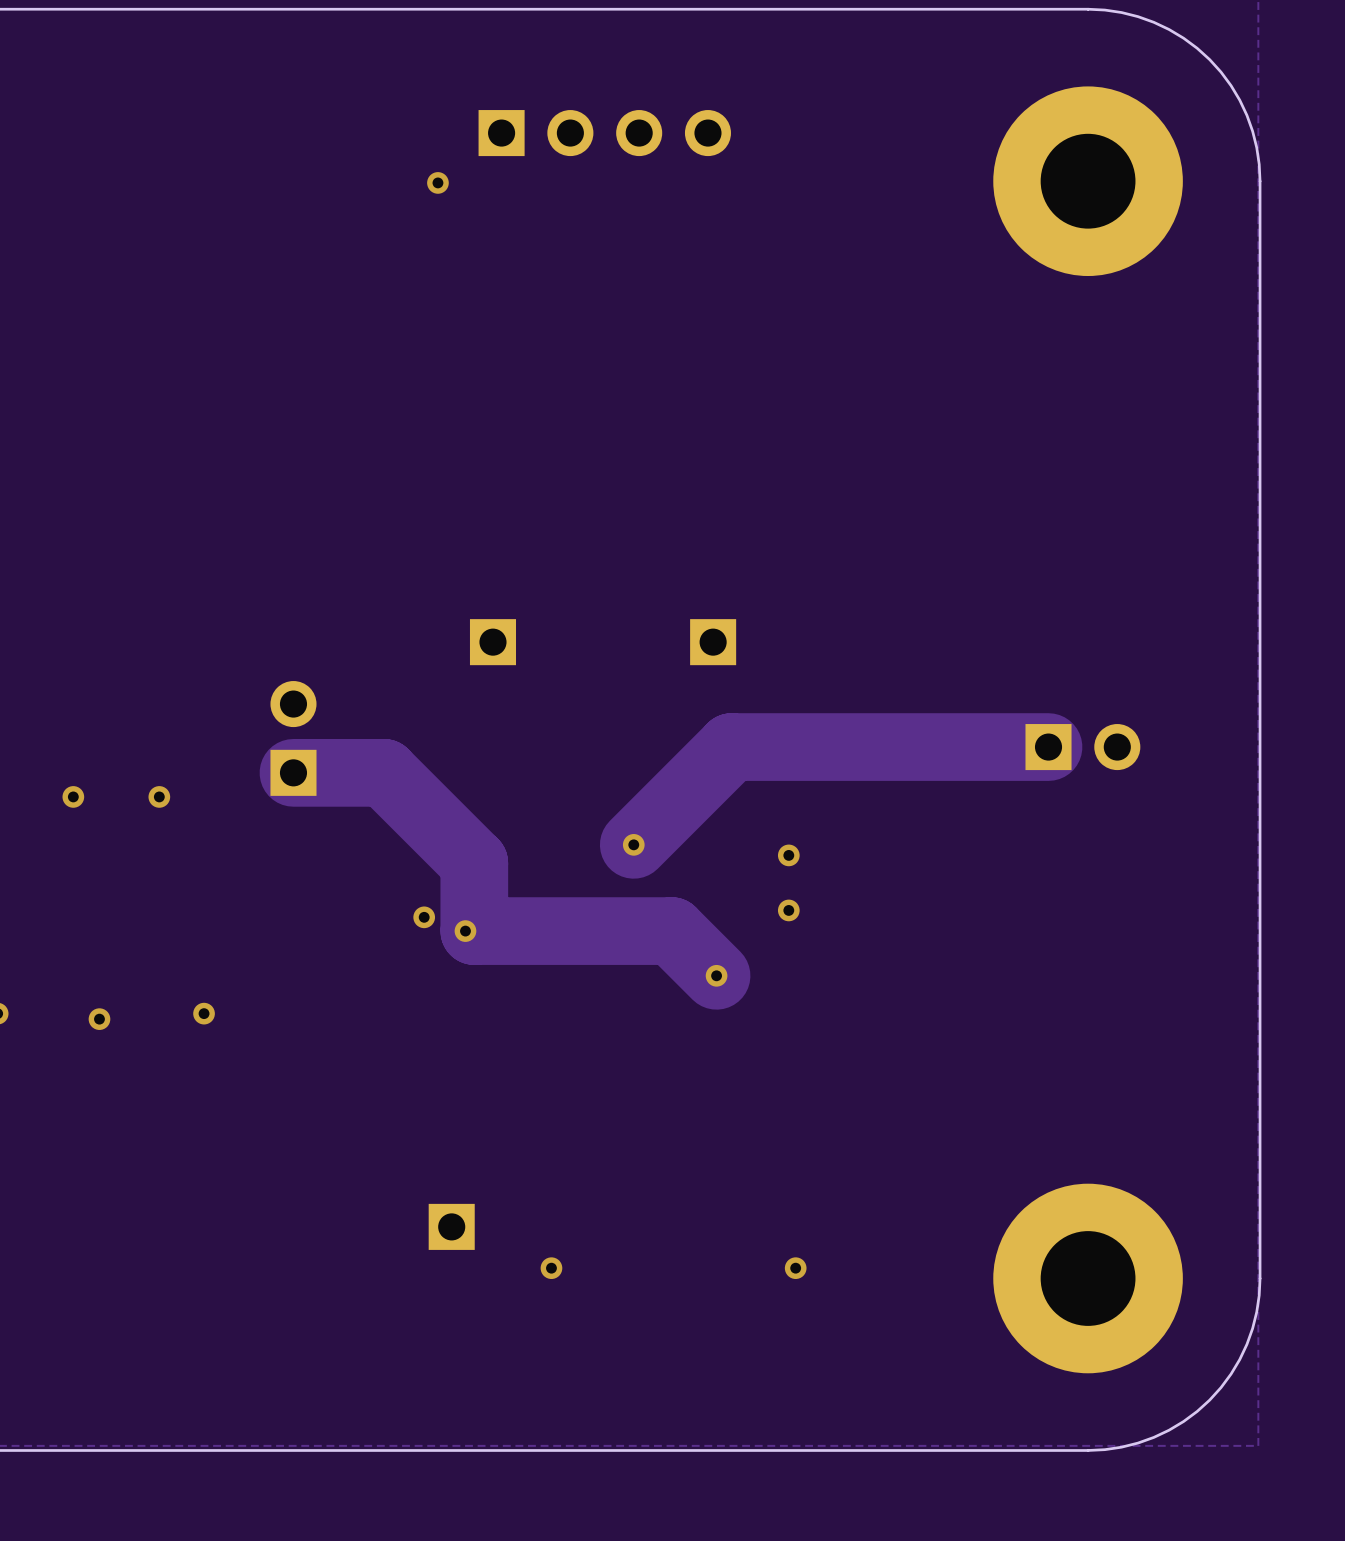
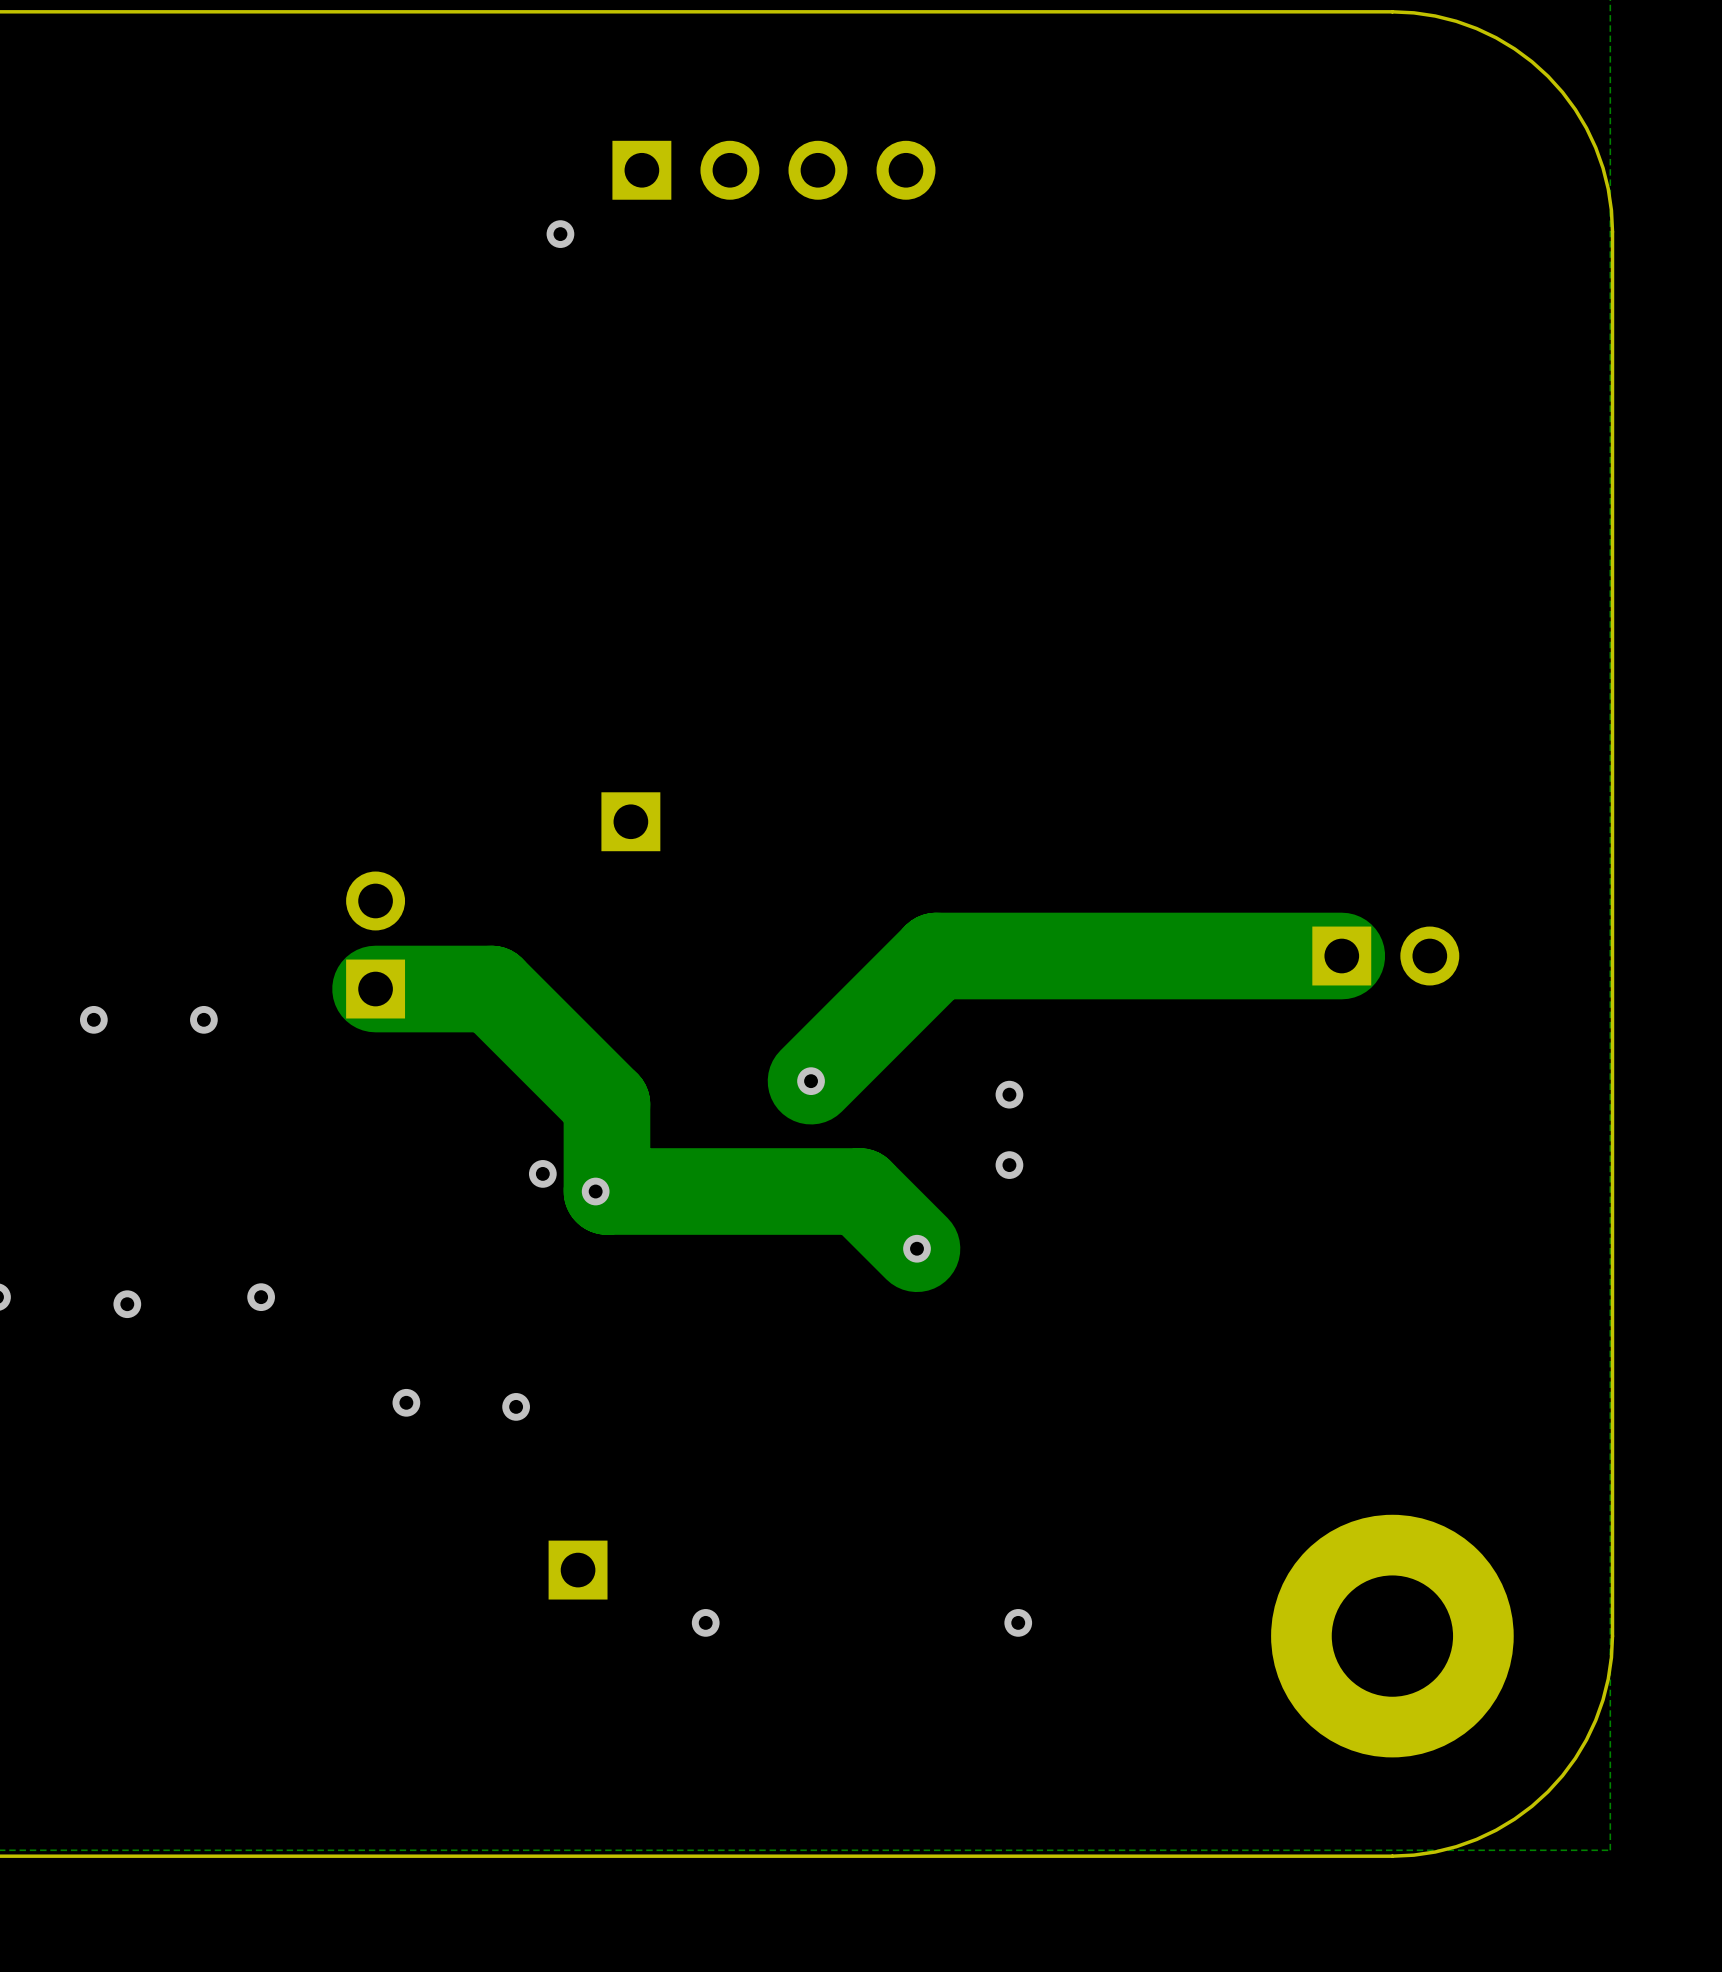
part: (1088, 181) -> none
part: (713, 642) -> none
via: none -> (406, 1402)
via: none -> (516, 1406)

